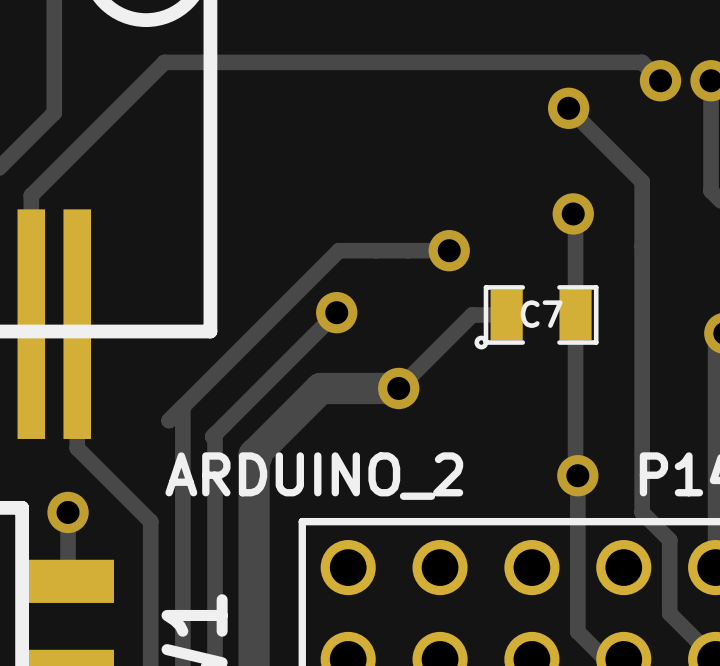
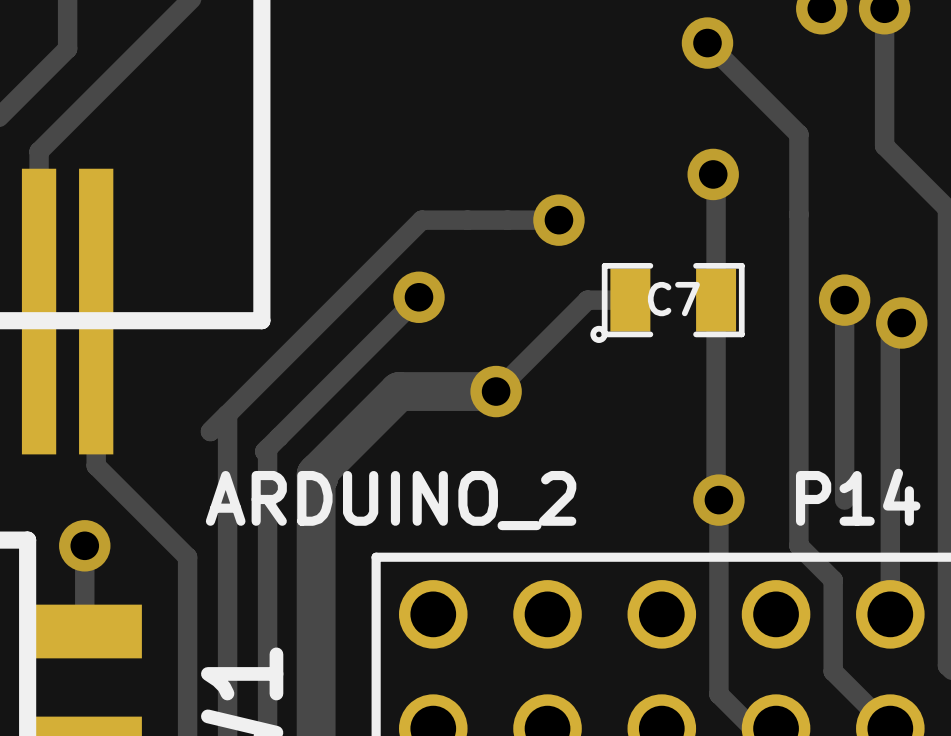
track: none -> (844, 300) (844, 500)
via: none -> (844, 300)

